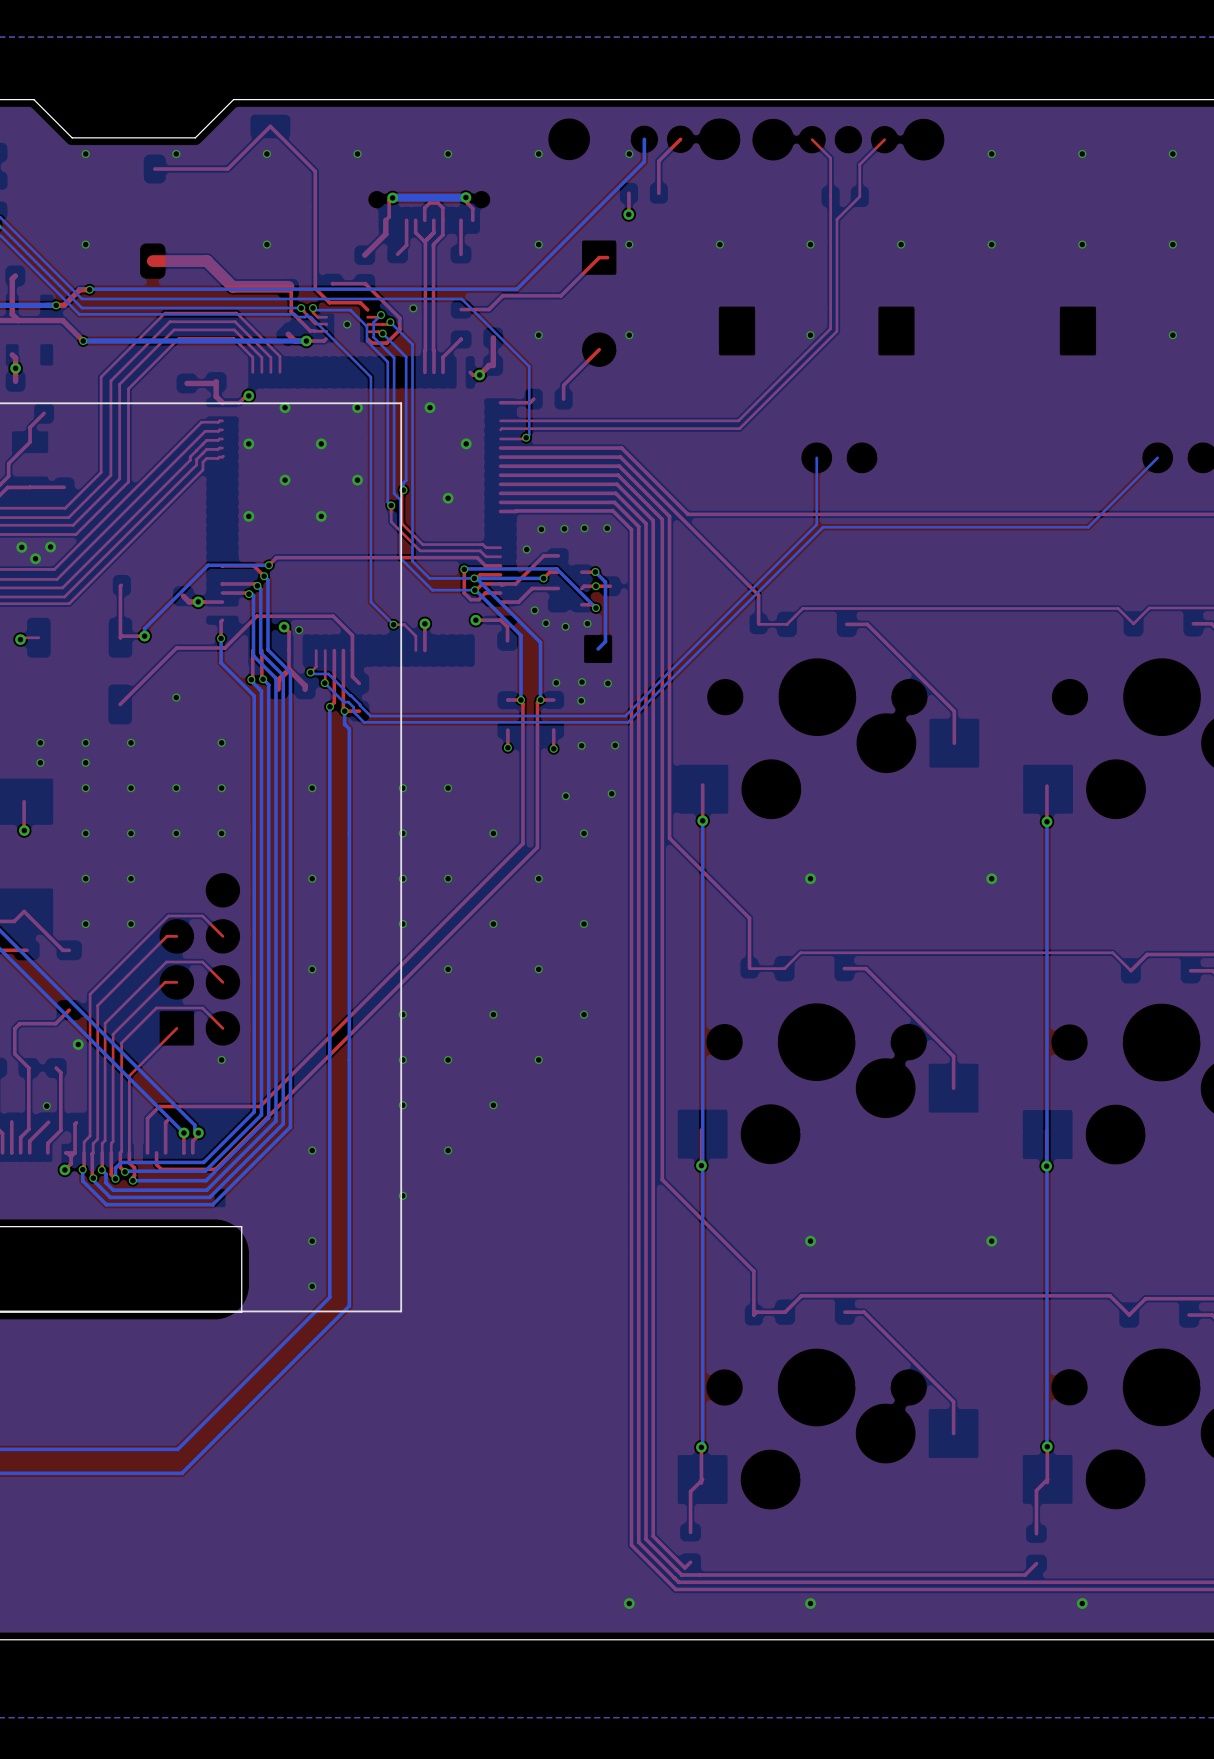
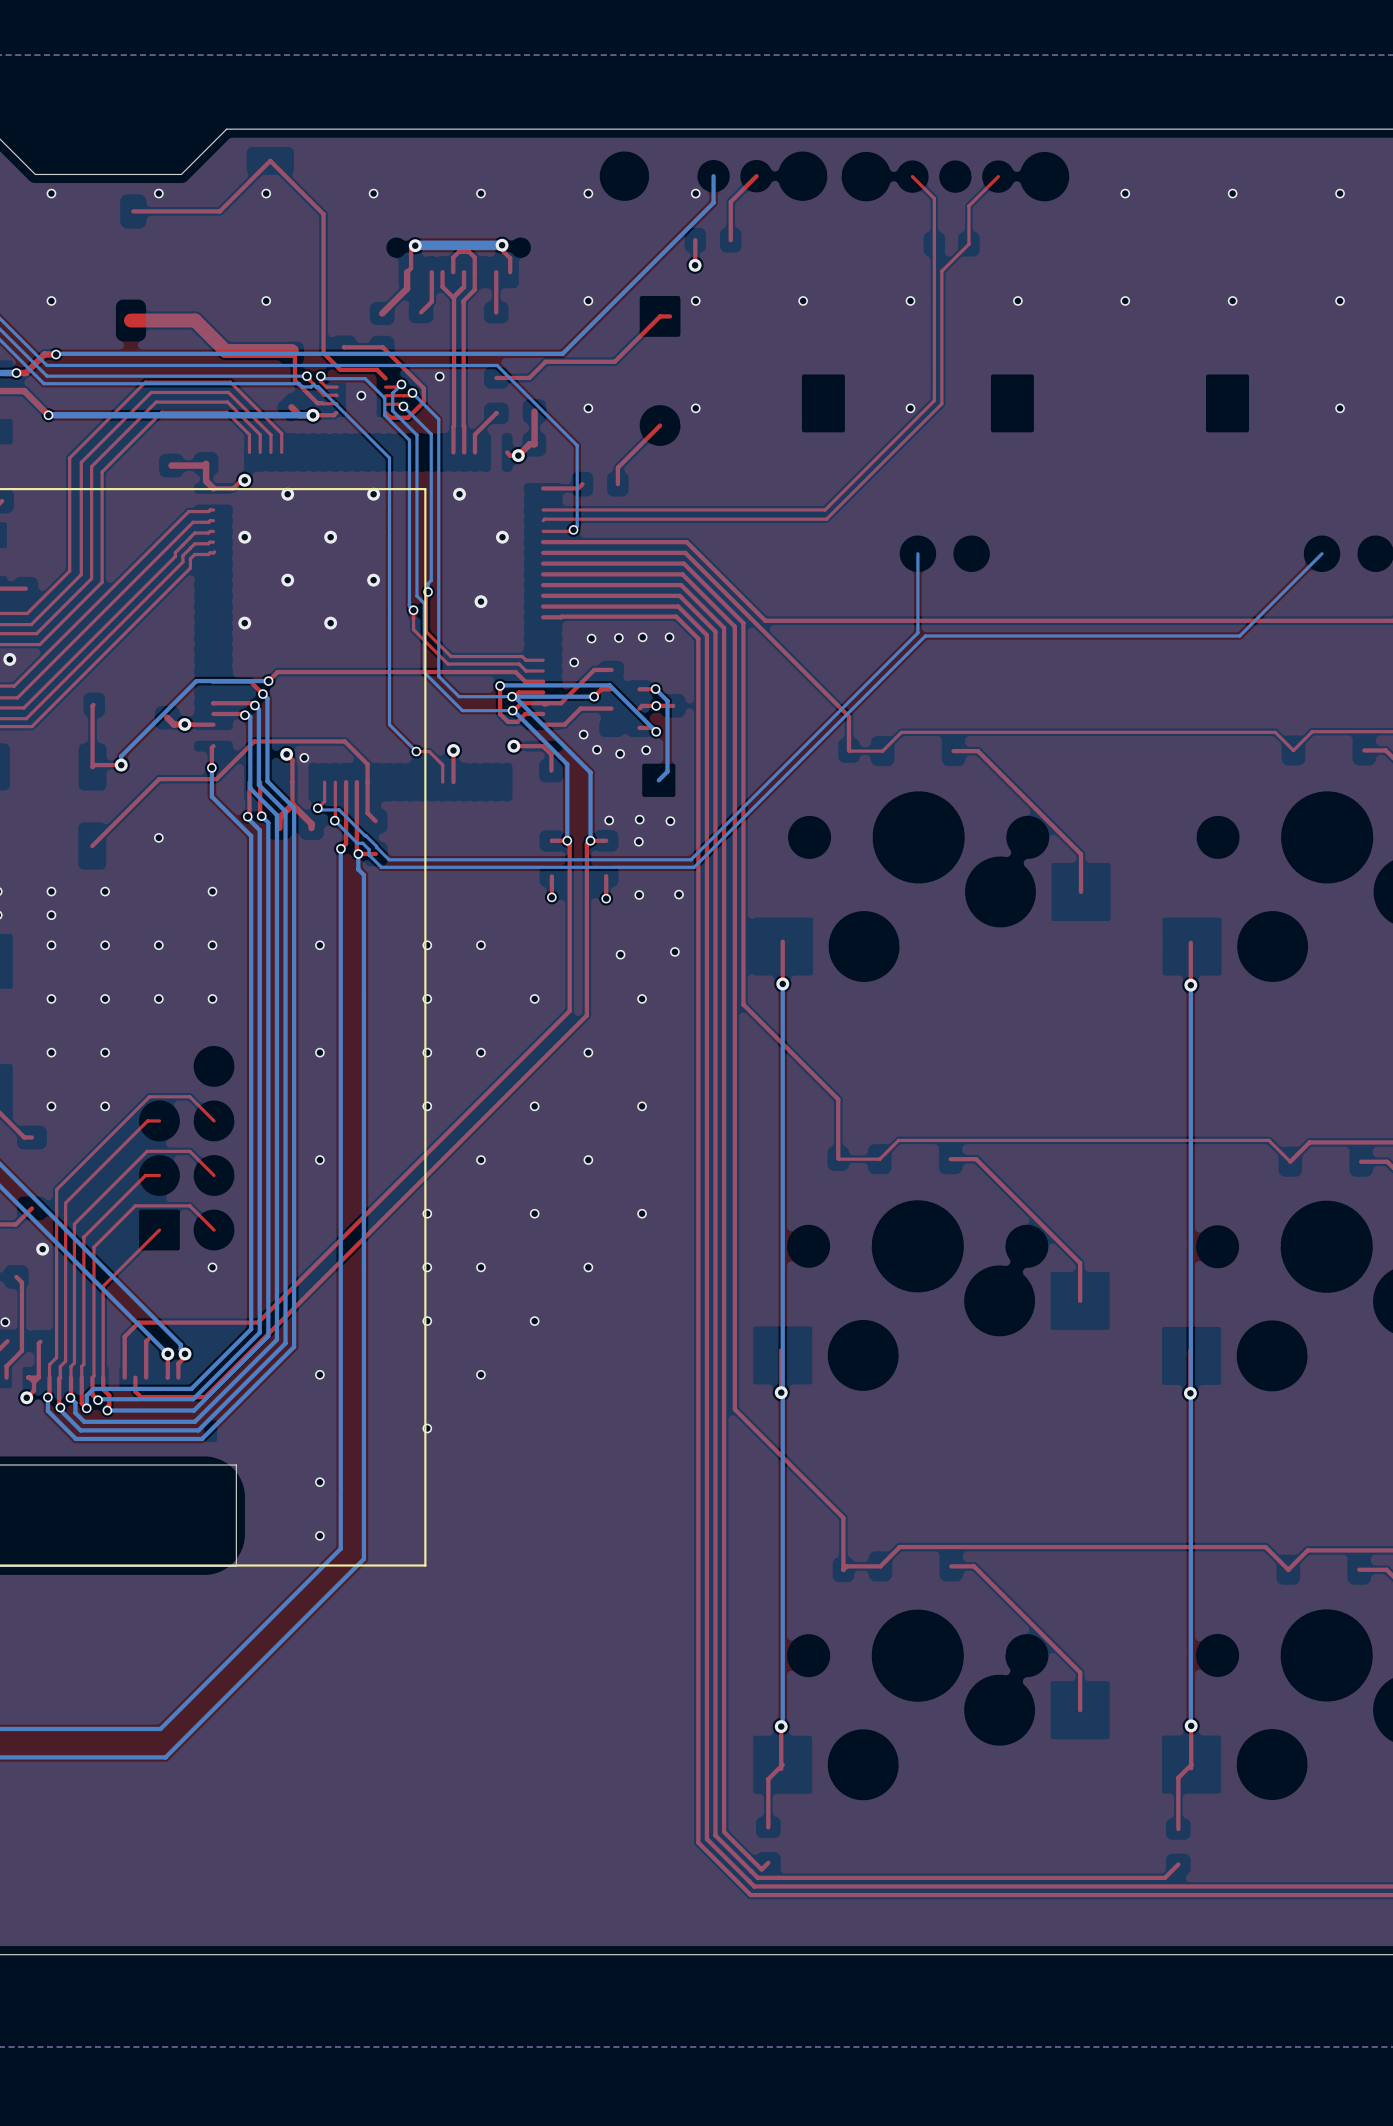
via: (810, 878) -> none
via: (991, 878) -> none
via: (810, 1241) -> none
via: (991, 1241) -> none
via: (629, 1603) -> none
via: (810, 1603) -> none
via: (1082, 1603) -> none

